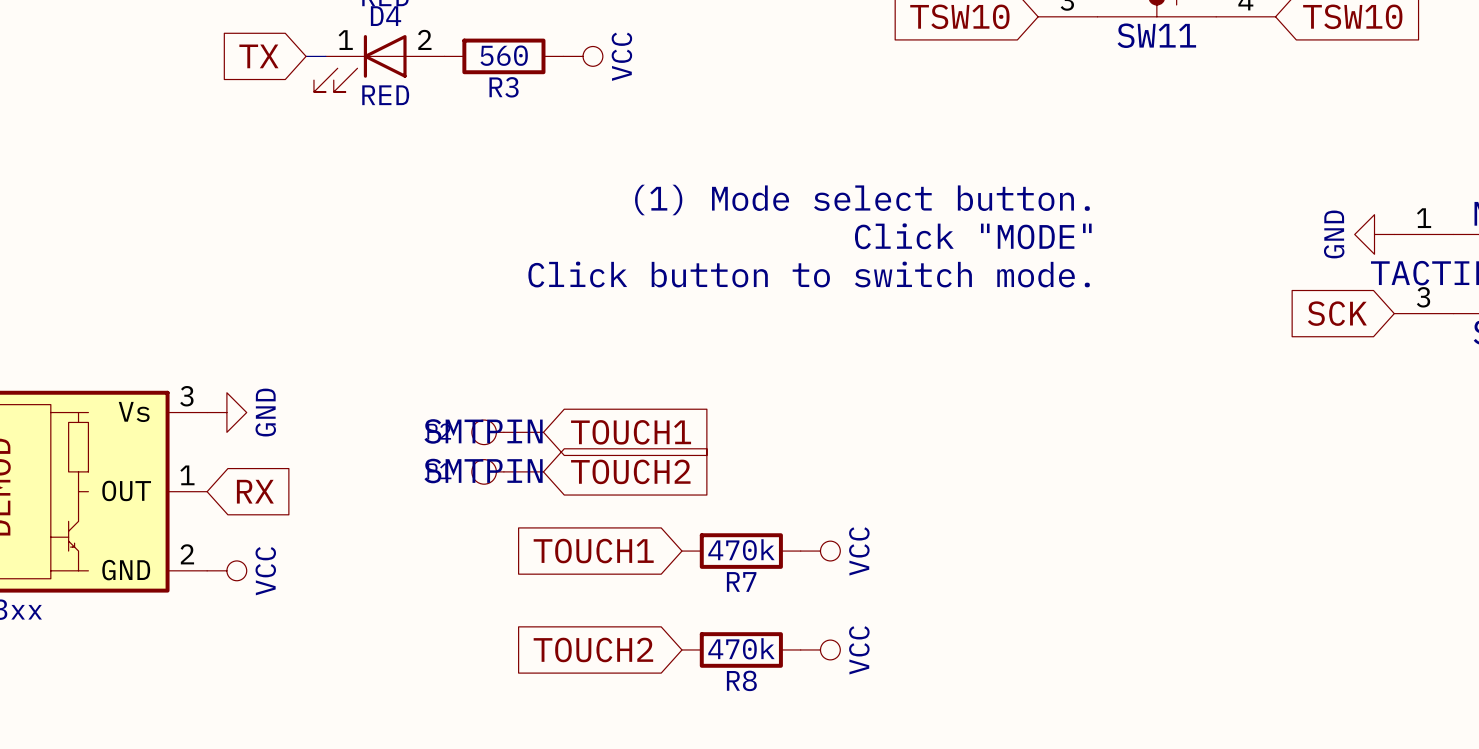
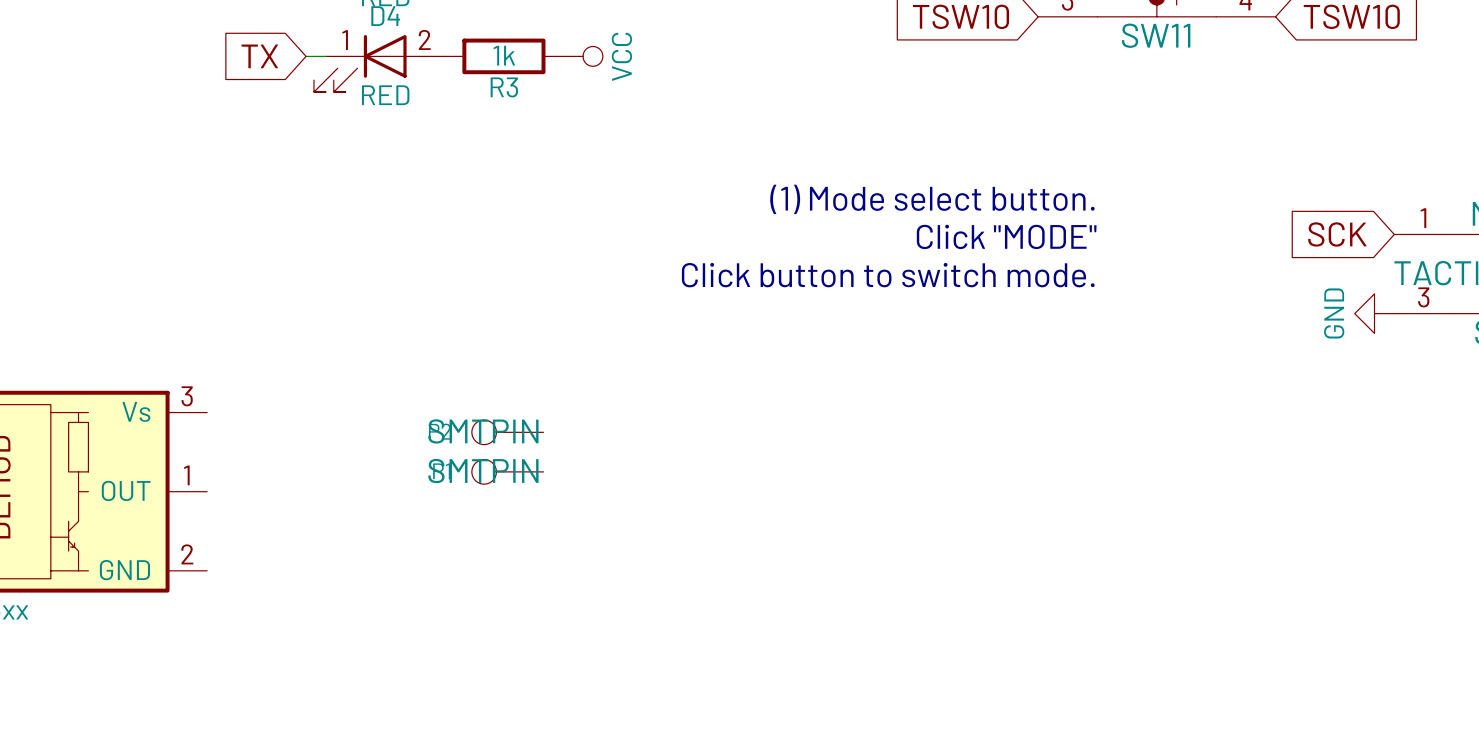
R3 value: 560 (504, 55) -> 1k (504, 55)
power symbol position: GND (1374, 234) -> GND (1374, 313)
global label position: SCK (1337, 313) -> SCK (1337, 234)
power symbol: GND (226, 412) -> none
global label: TOUCH1 (631, 432) -> none
global label: TOUCH2 (630, 471) -> none
global label: RX (255, 491) -> none
global label: TOUCH1 (593, 551) -> none
R7: 470k (741, 551) -> none
power symbol: VCC (820, 551) -> none
power symbol: VCC (226, 570) -> none
global label: TOUCH2 (593, 649) -> none
R8: 470k (741, 649) -> none
power symbol: VCC (820, 649) -> none

